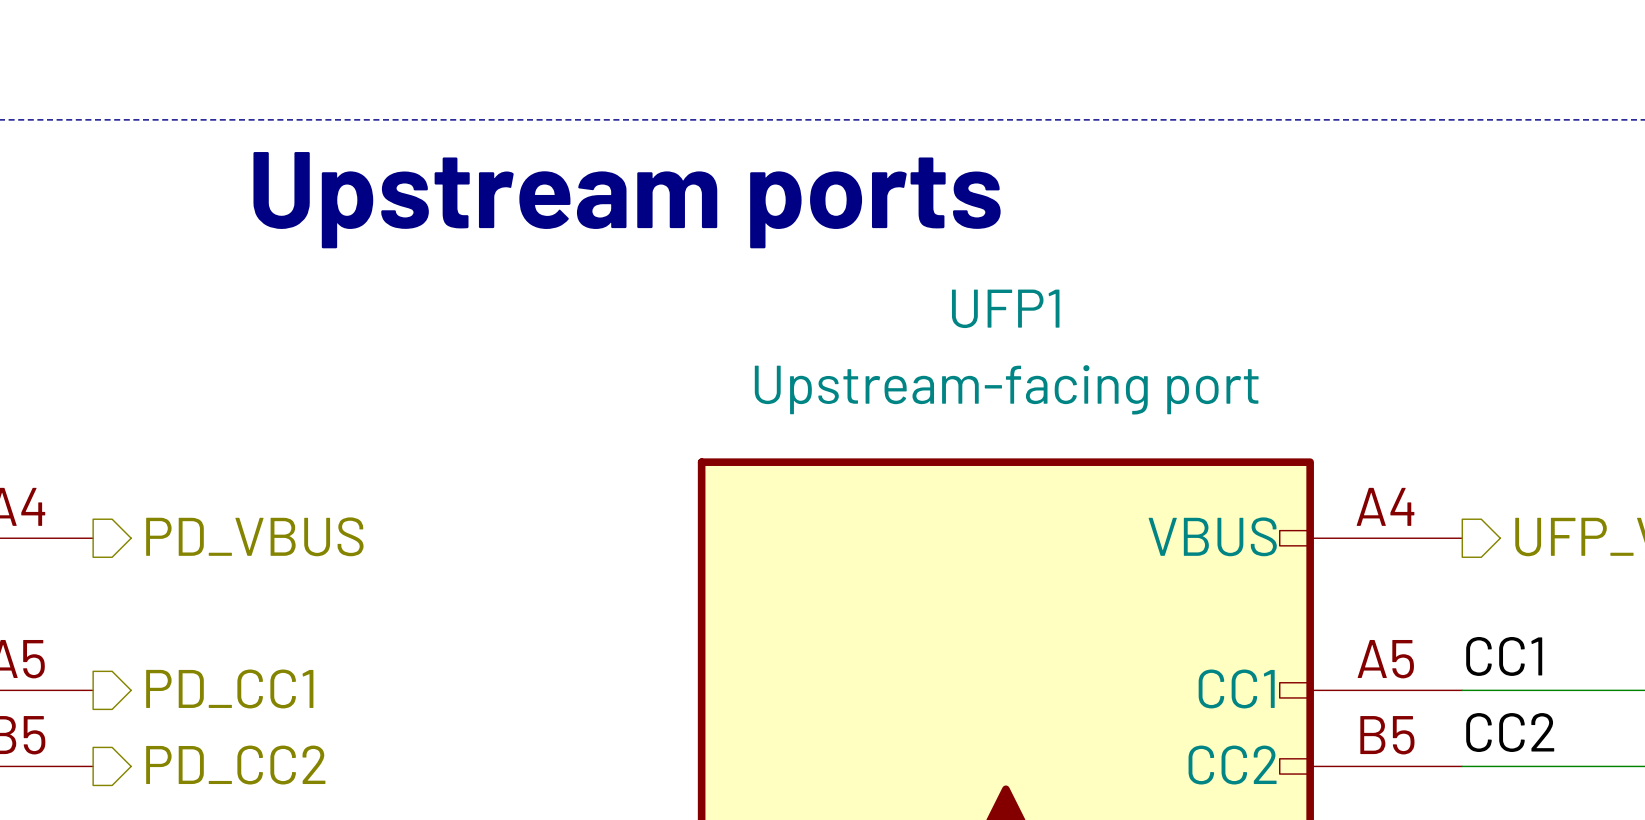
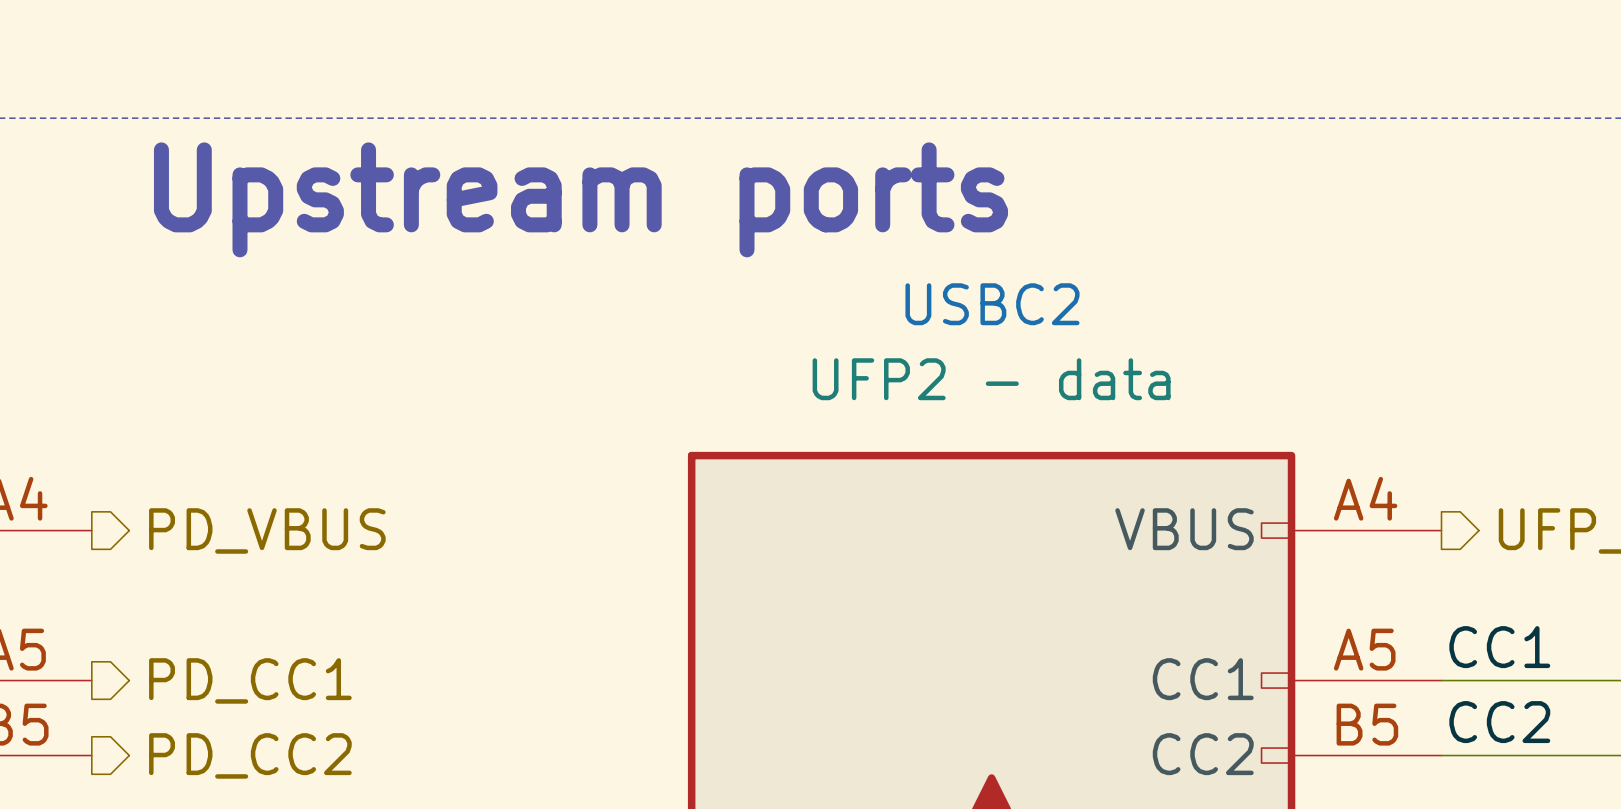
text position: Upstream ports (627, 200) -> Upstream ports (580, 199)
UFP1 name: UFP1 (1005, 308) -> USBC2 (992, 304)
UFP1 value: Upstream-facing port (1006, 389) -> UFP2 - data (991, 379)

